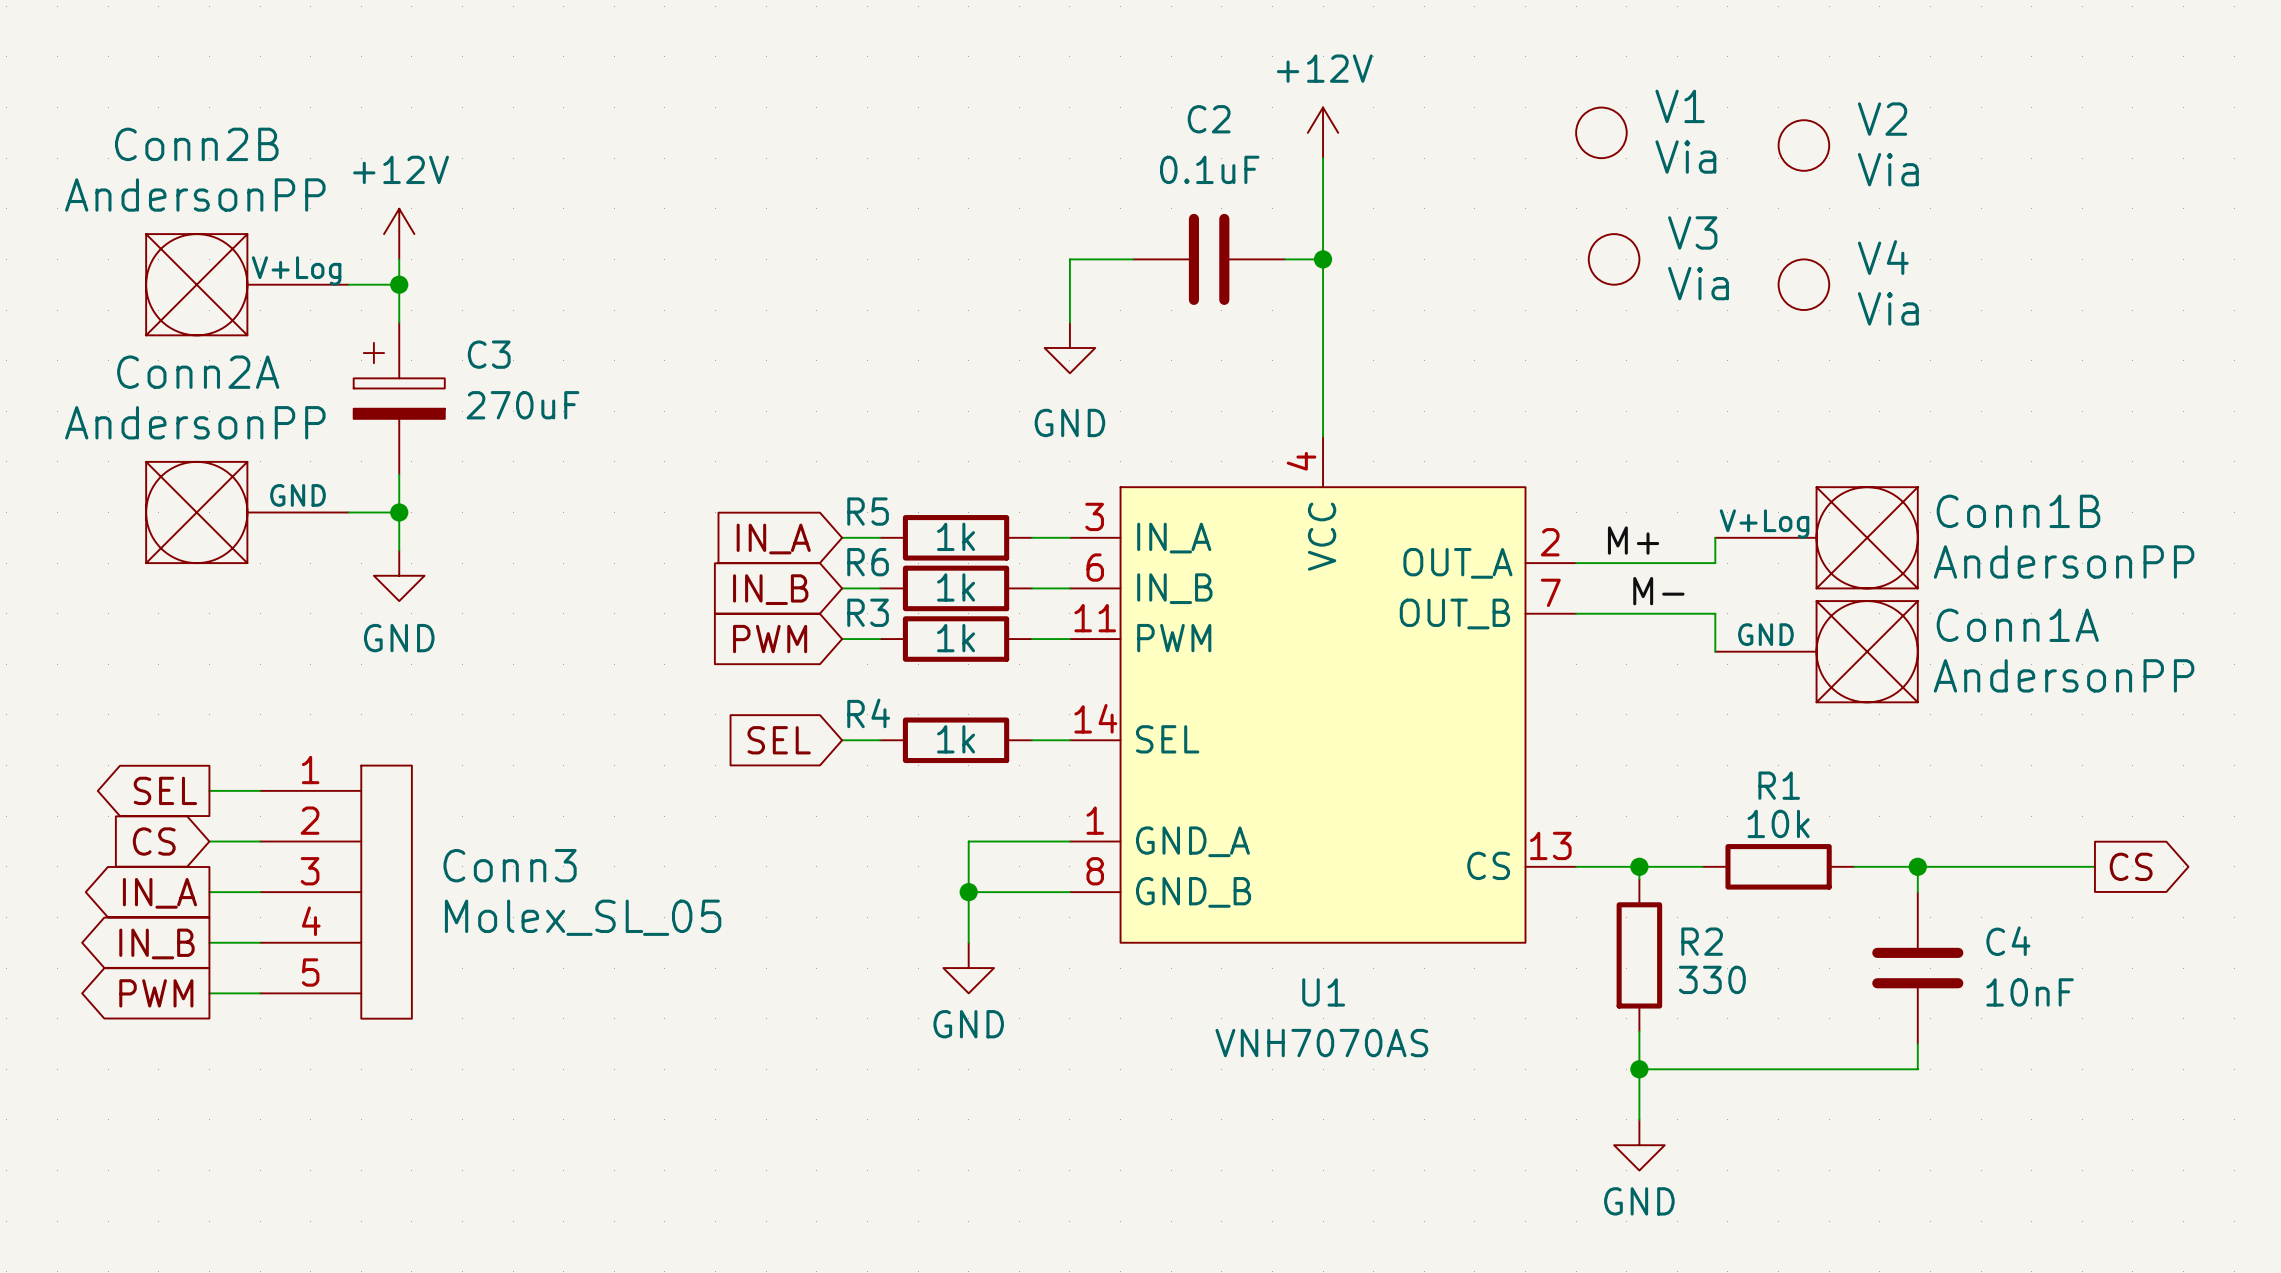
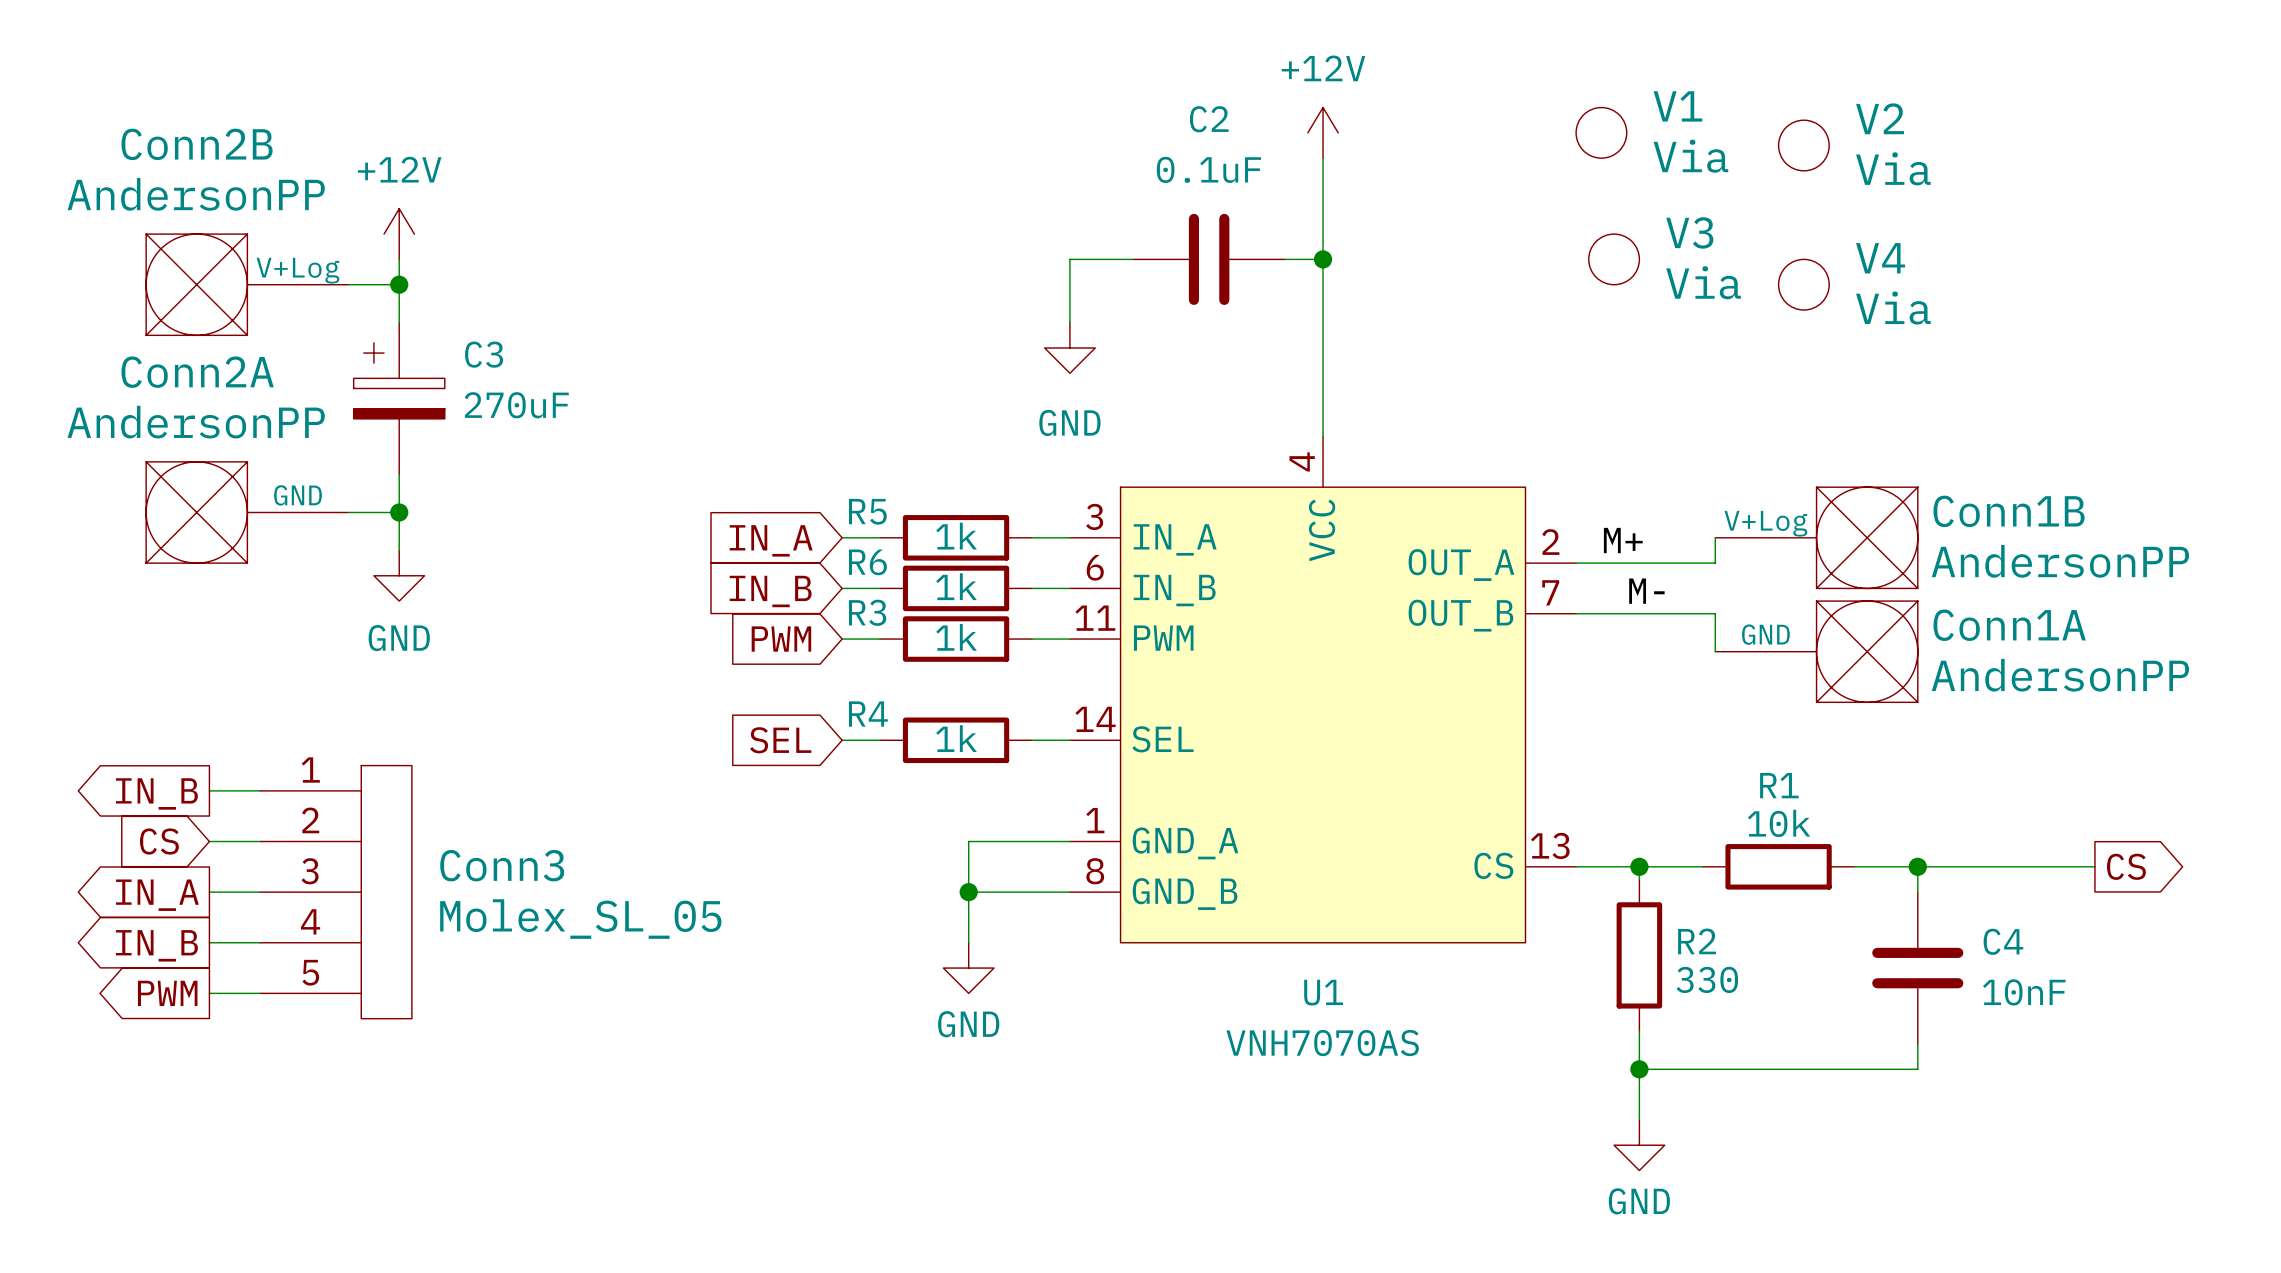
global label: SEL (165, 790) -> IN_B (156, 793)

